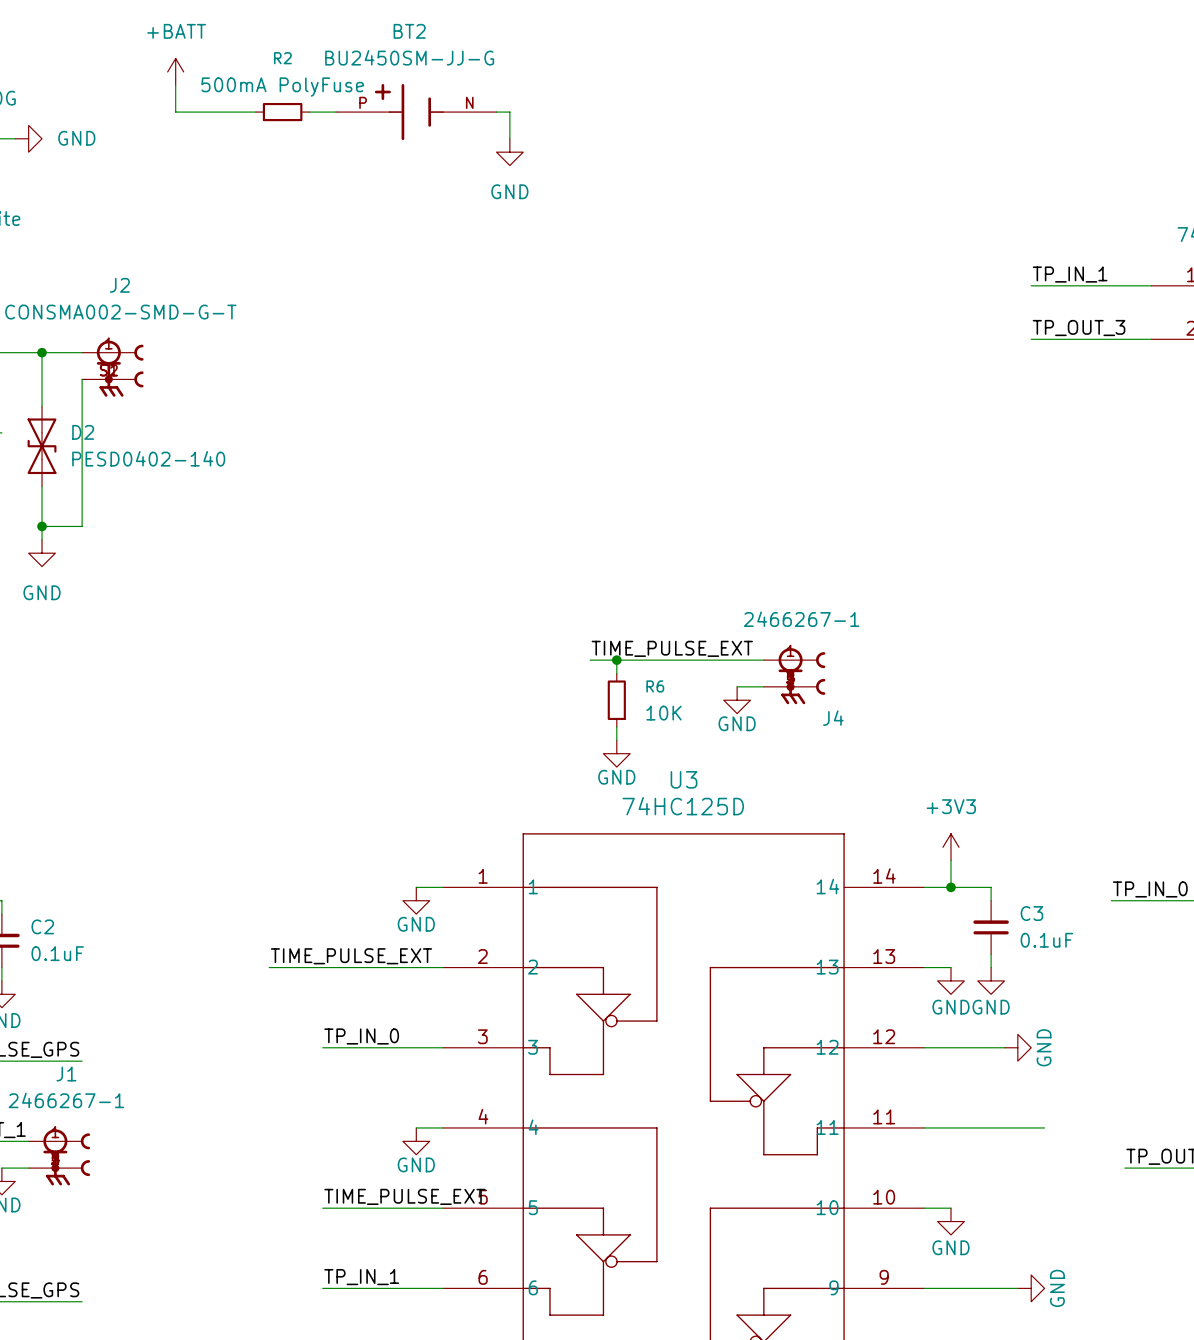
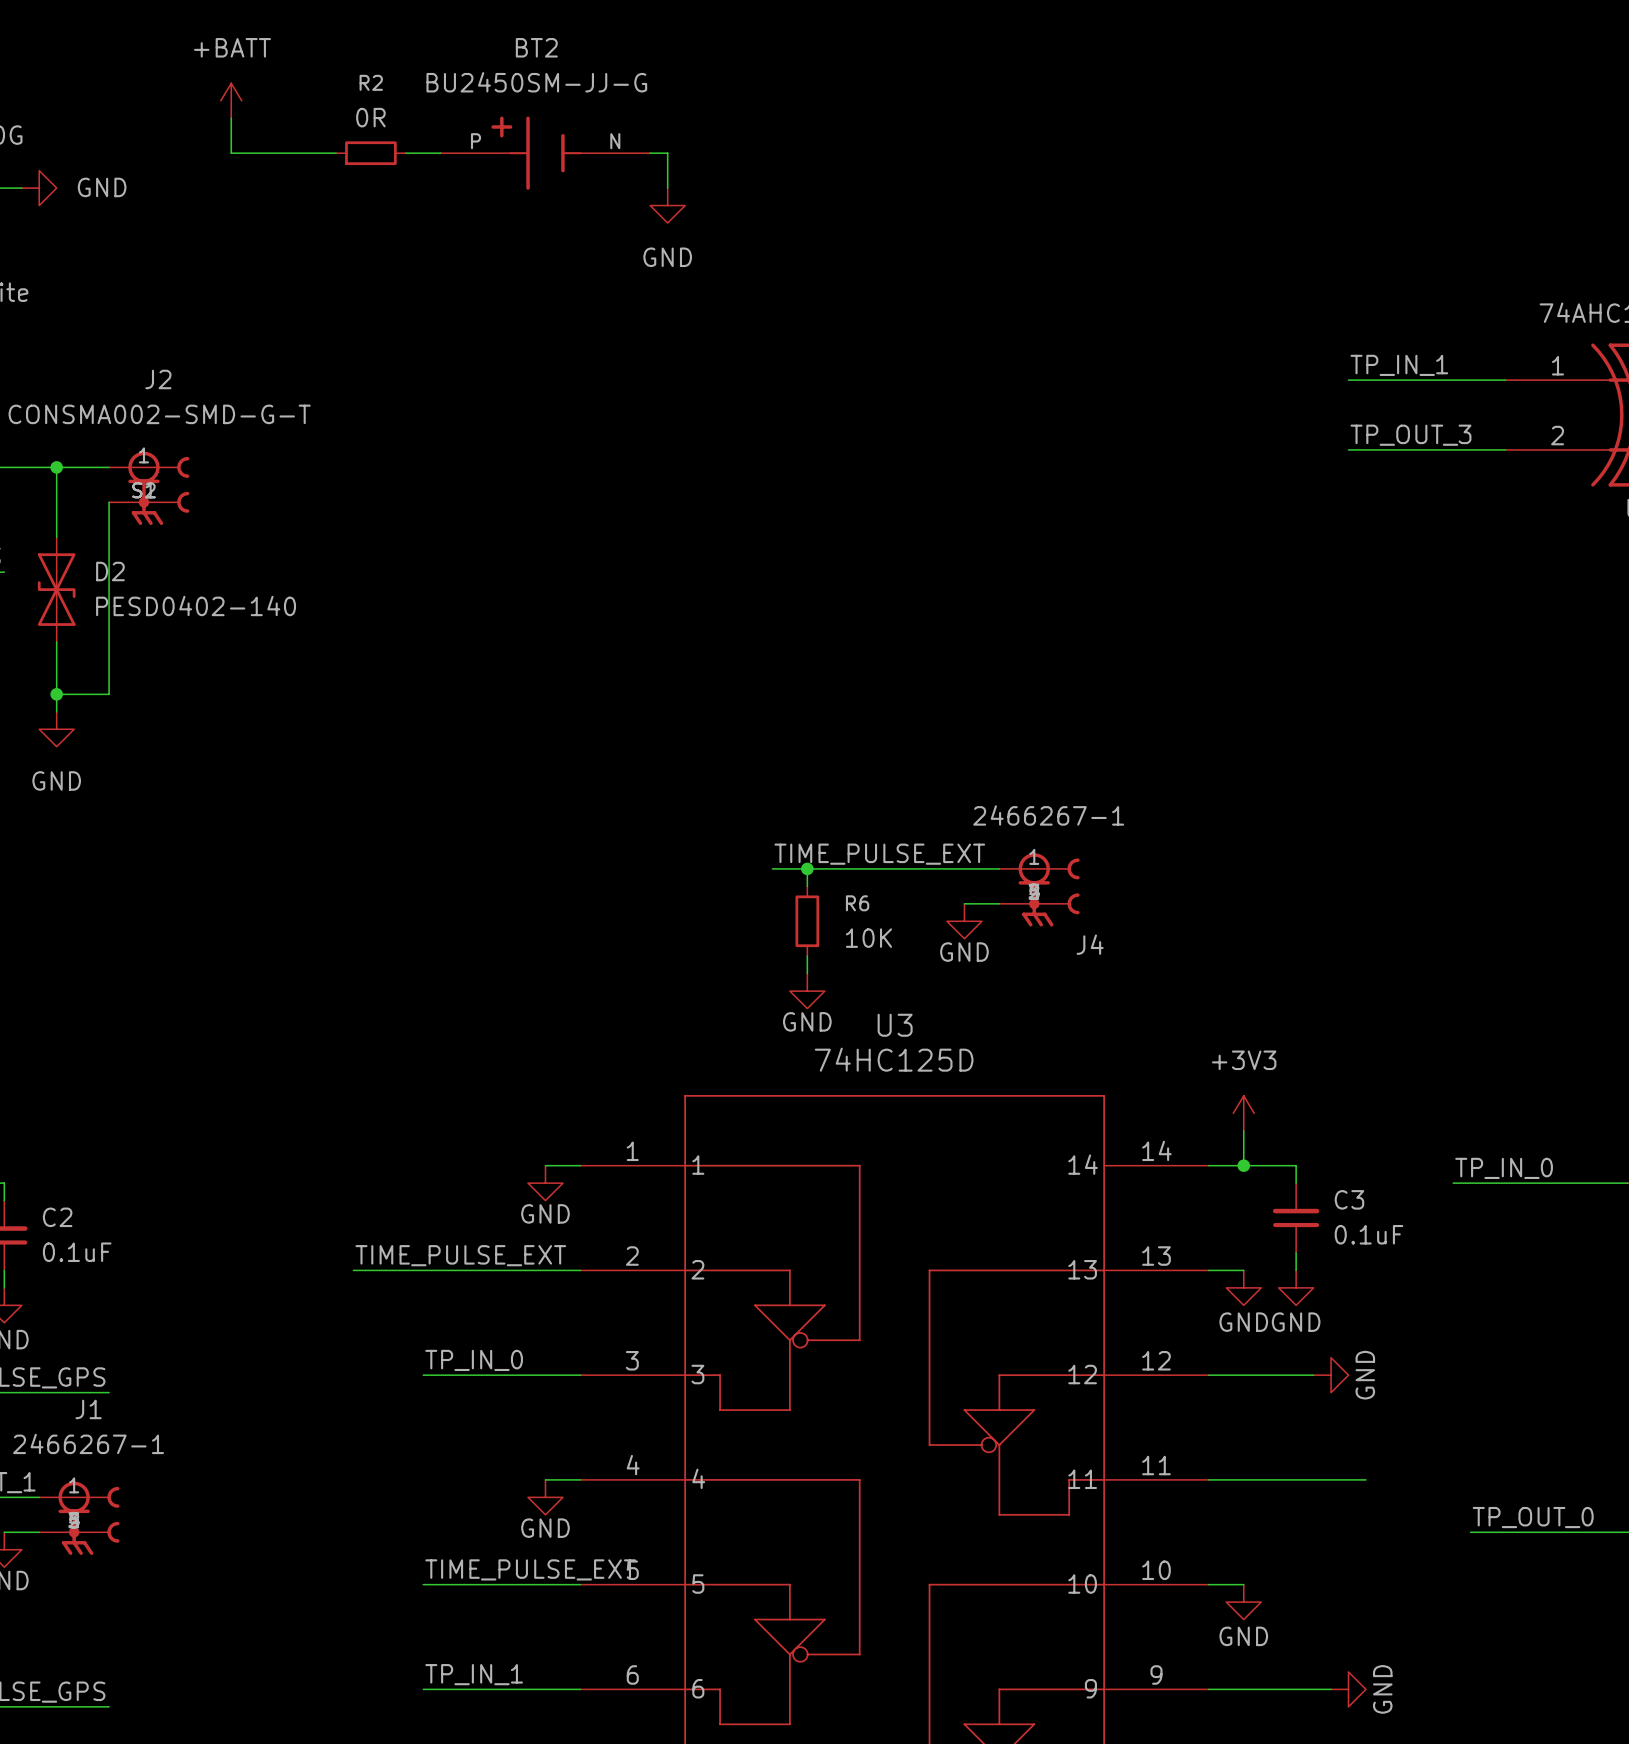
R2 value: 500mA PolyFuse (282, 87) -> 0R (370, 117)

